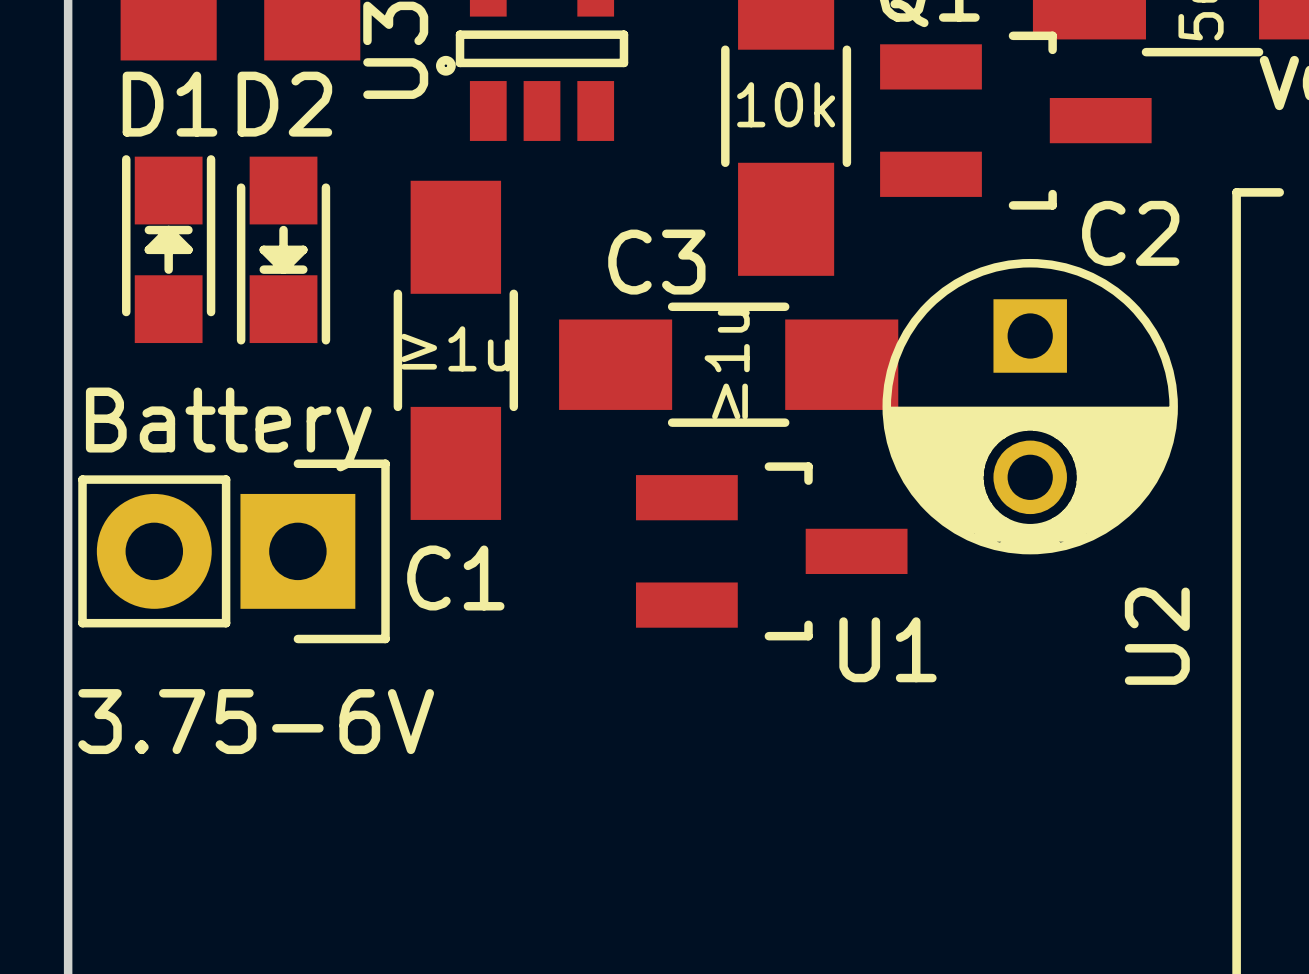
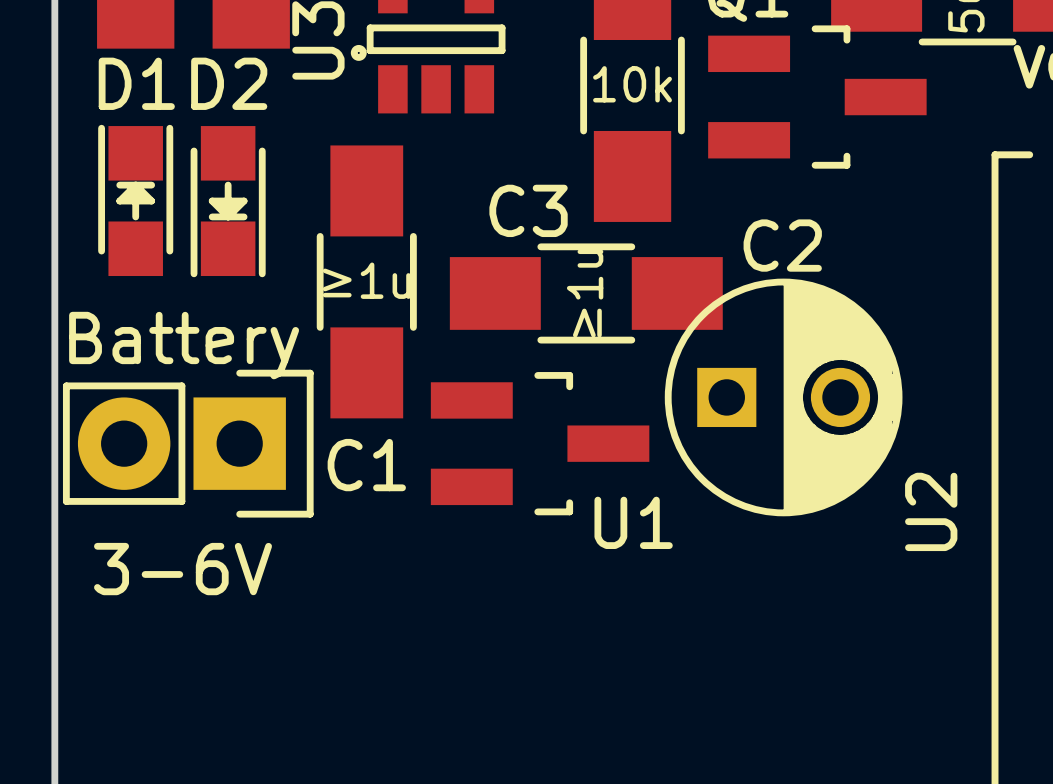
C2 rotation: 0° (1030, 406) -> 90° counterclockwise (783, 397)
U1 position: (771, 551) -> (540, 443)
text: 3.75-6V (256, 721) -> 3-6V (183, 569)

